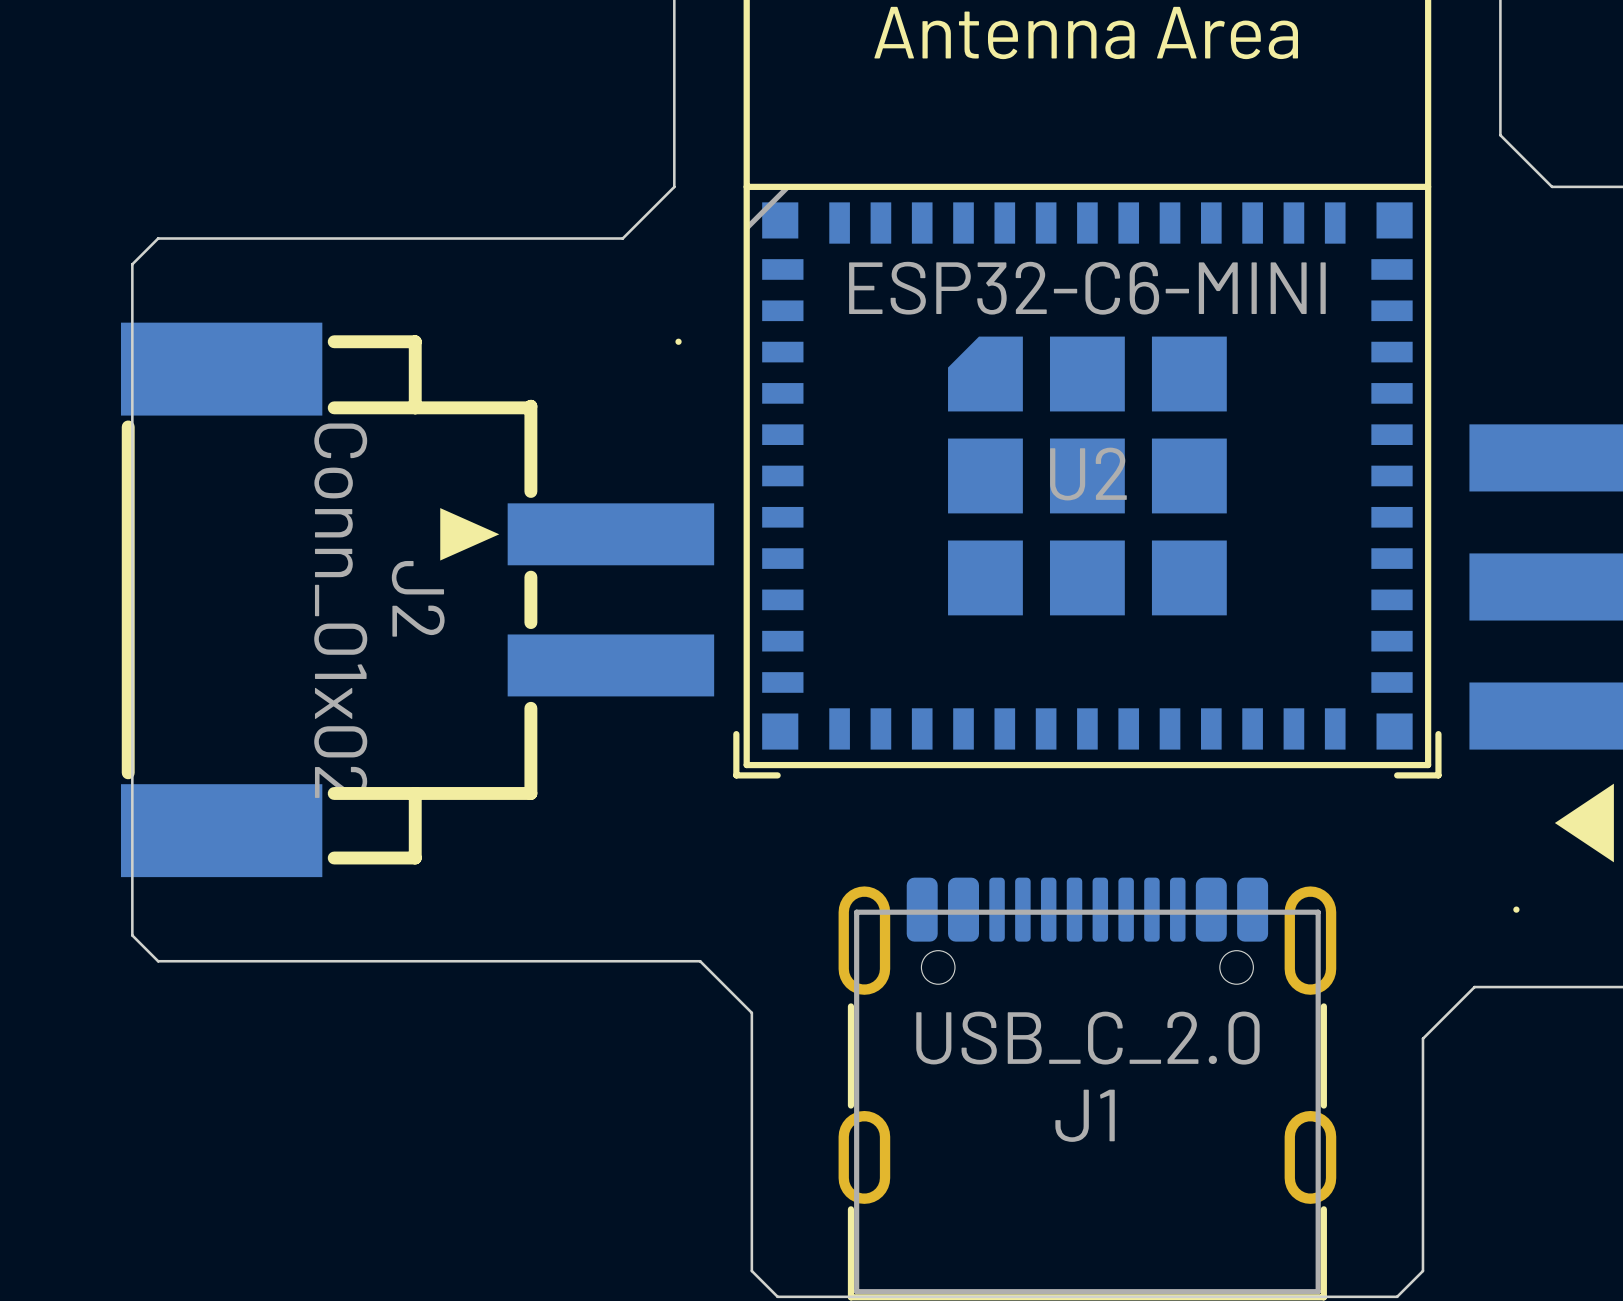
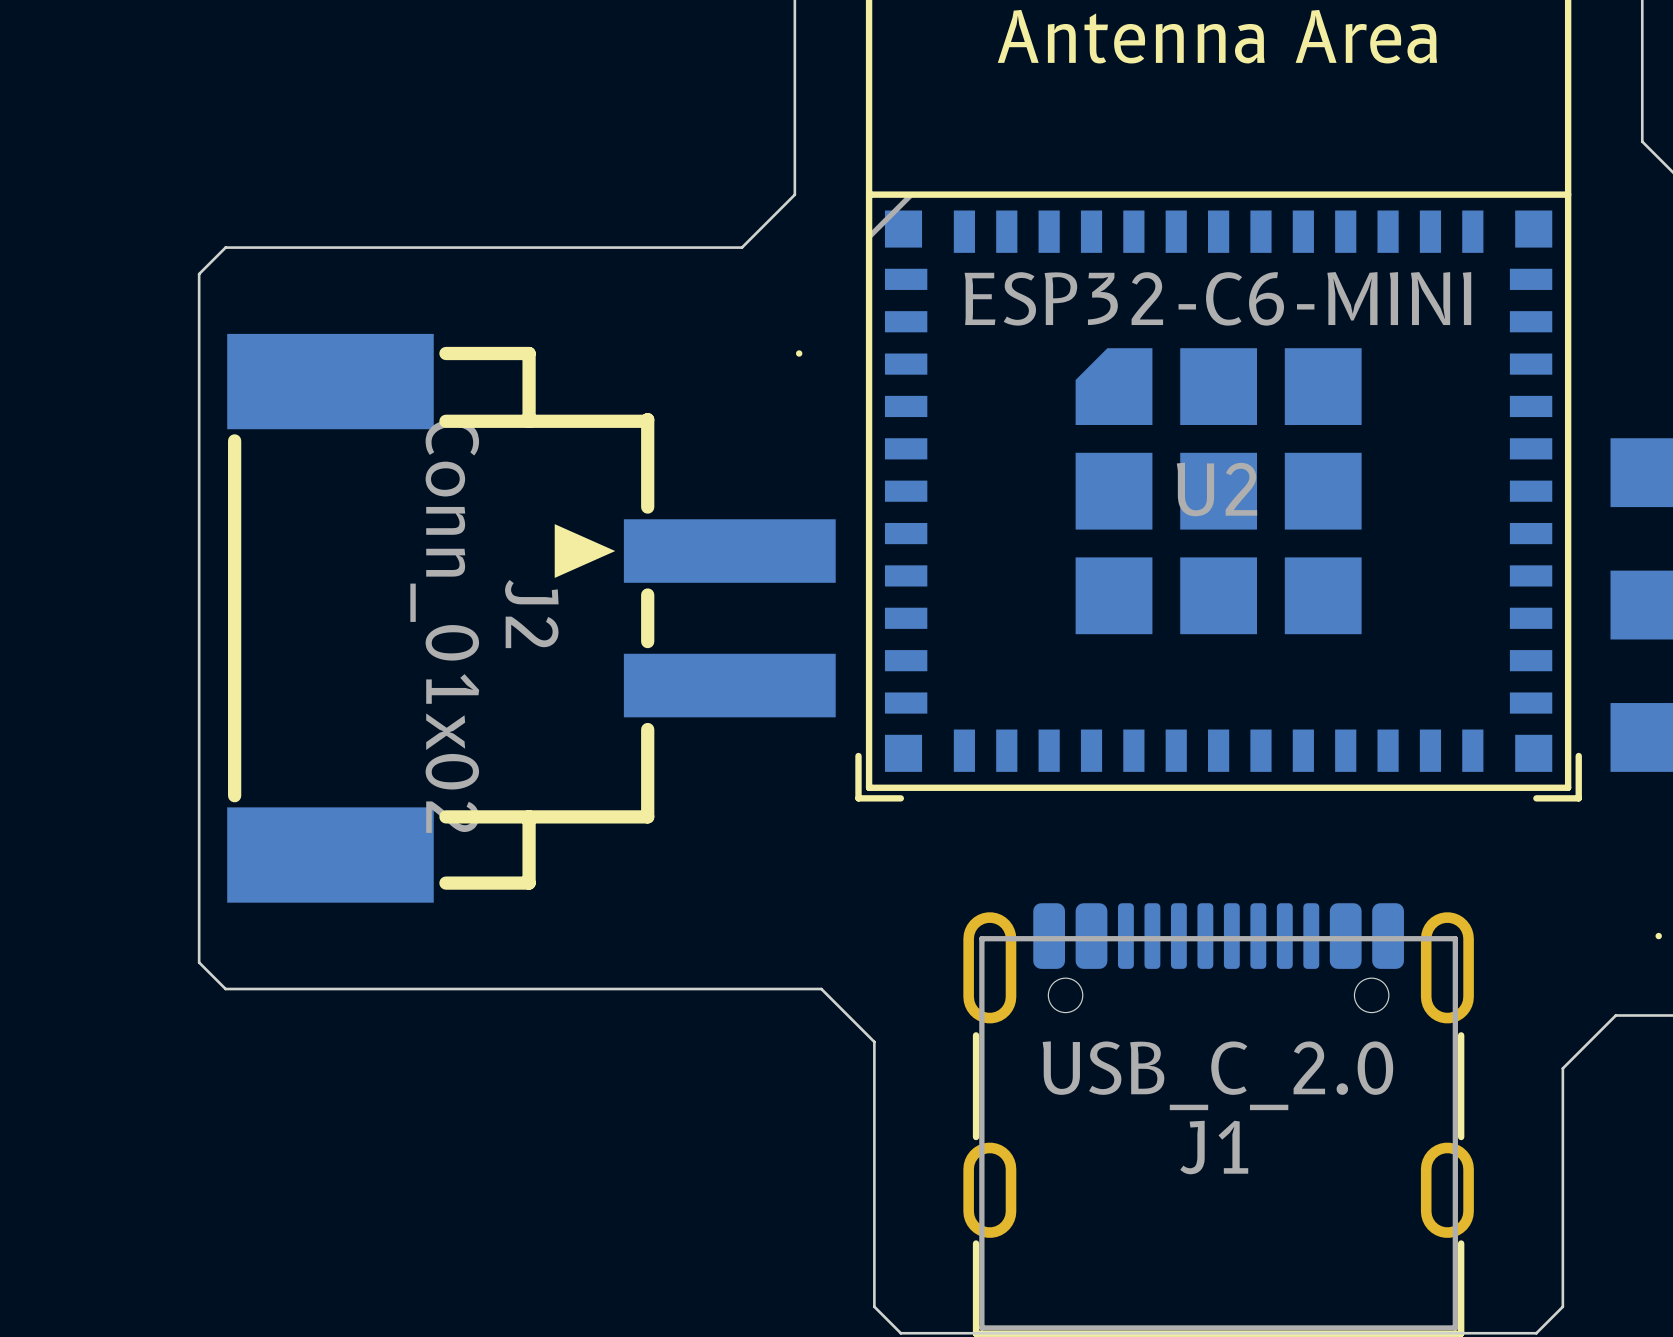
board edge: (158, 238) (132, 264) (132, 935) (158, 961) -> (265, 247) (225, 247) (199, 274) (199, 962) (225, 989) (265, 989)

